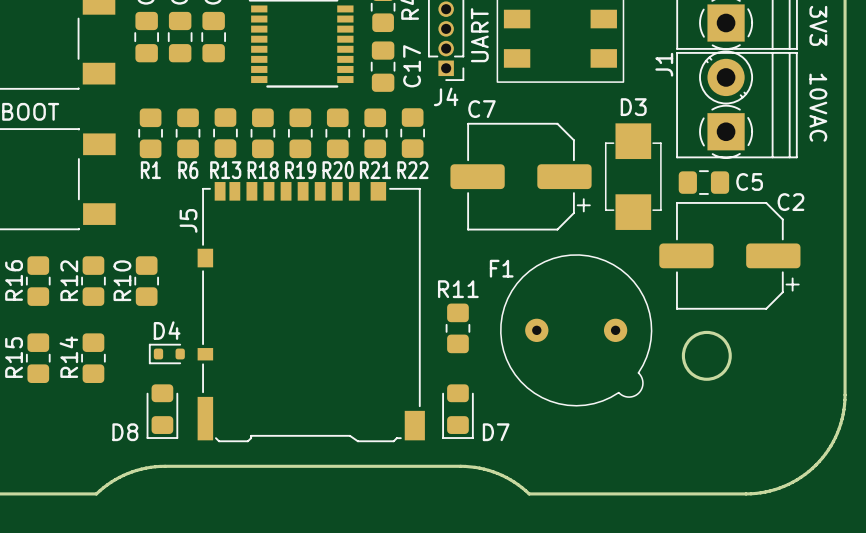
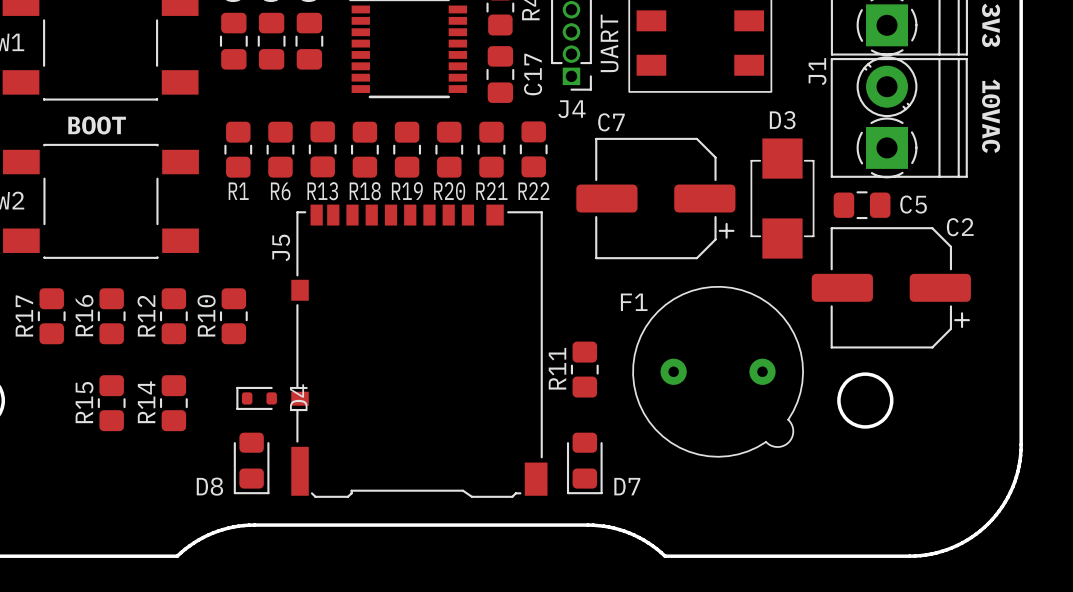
R11 name rotation: 0° (458, 289) -> 90° counterclockwise (557, 368)
D4 name rotation: 0° (167, 330) -> 90° counterclockwise (298, 397)
D4 name position: D4 (167, 330) -> D4 (298, 397)

